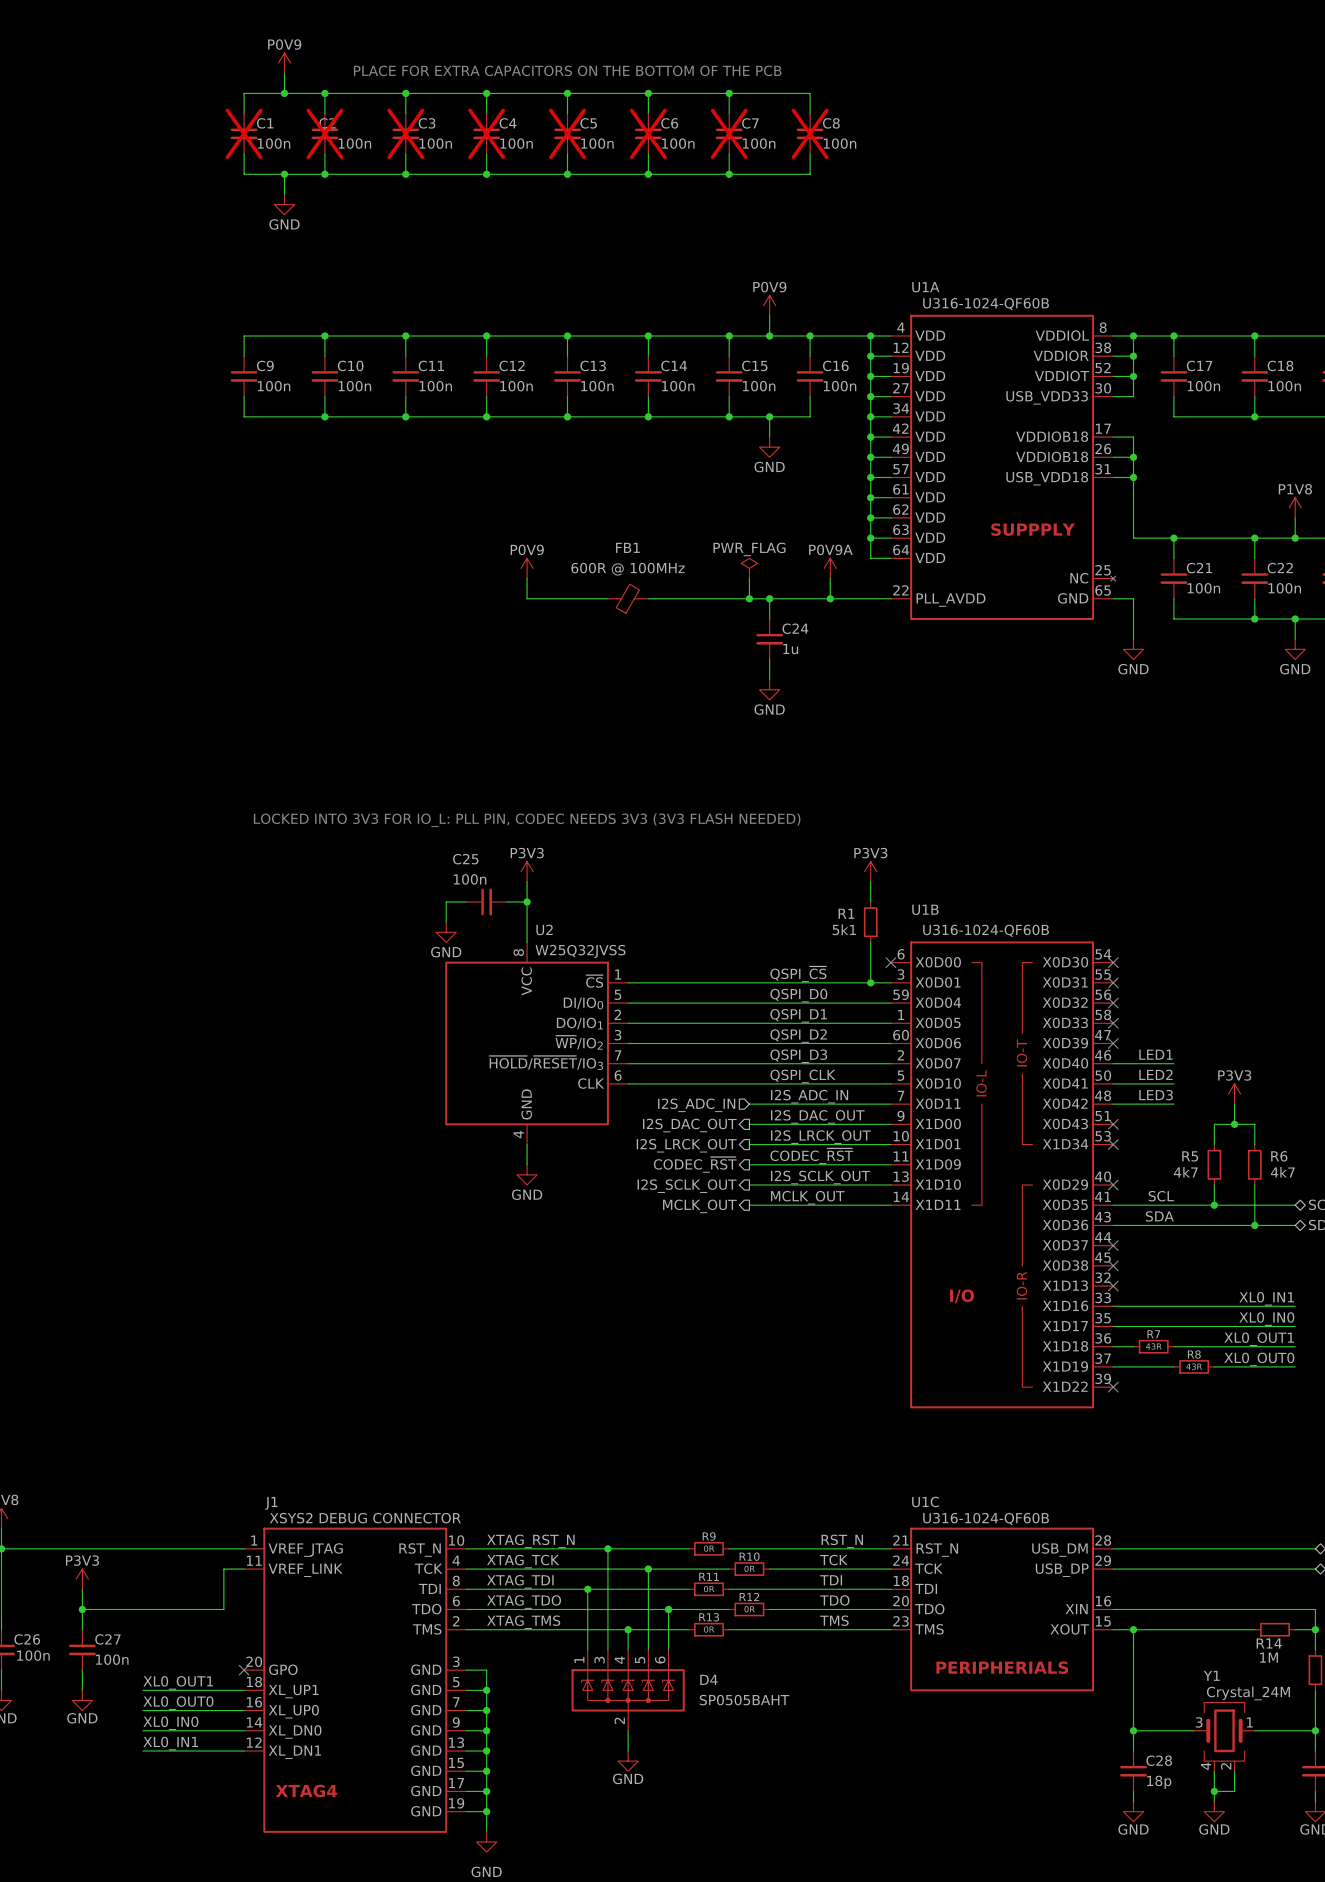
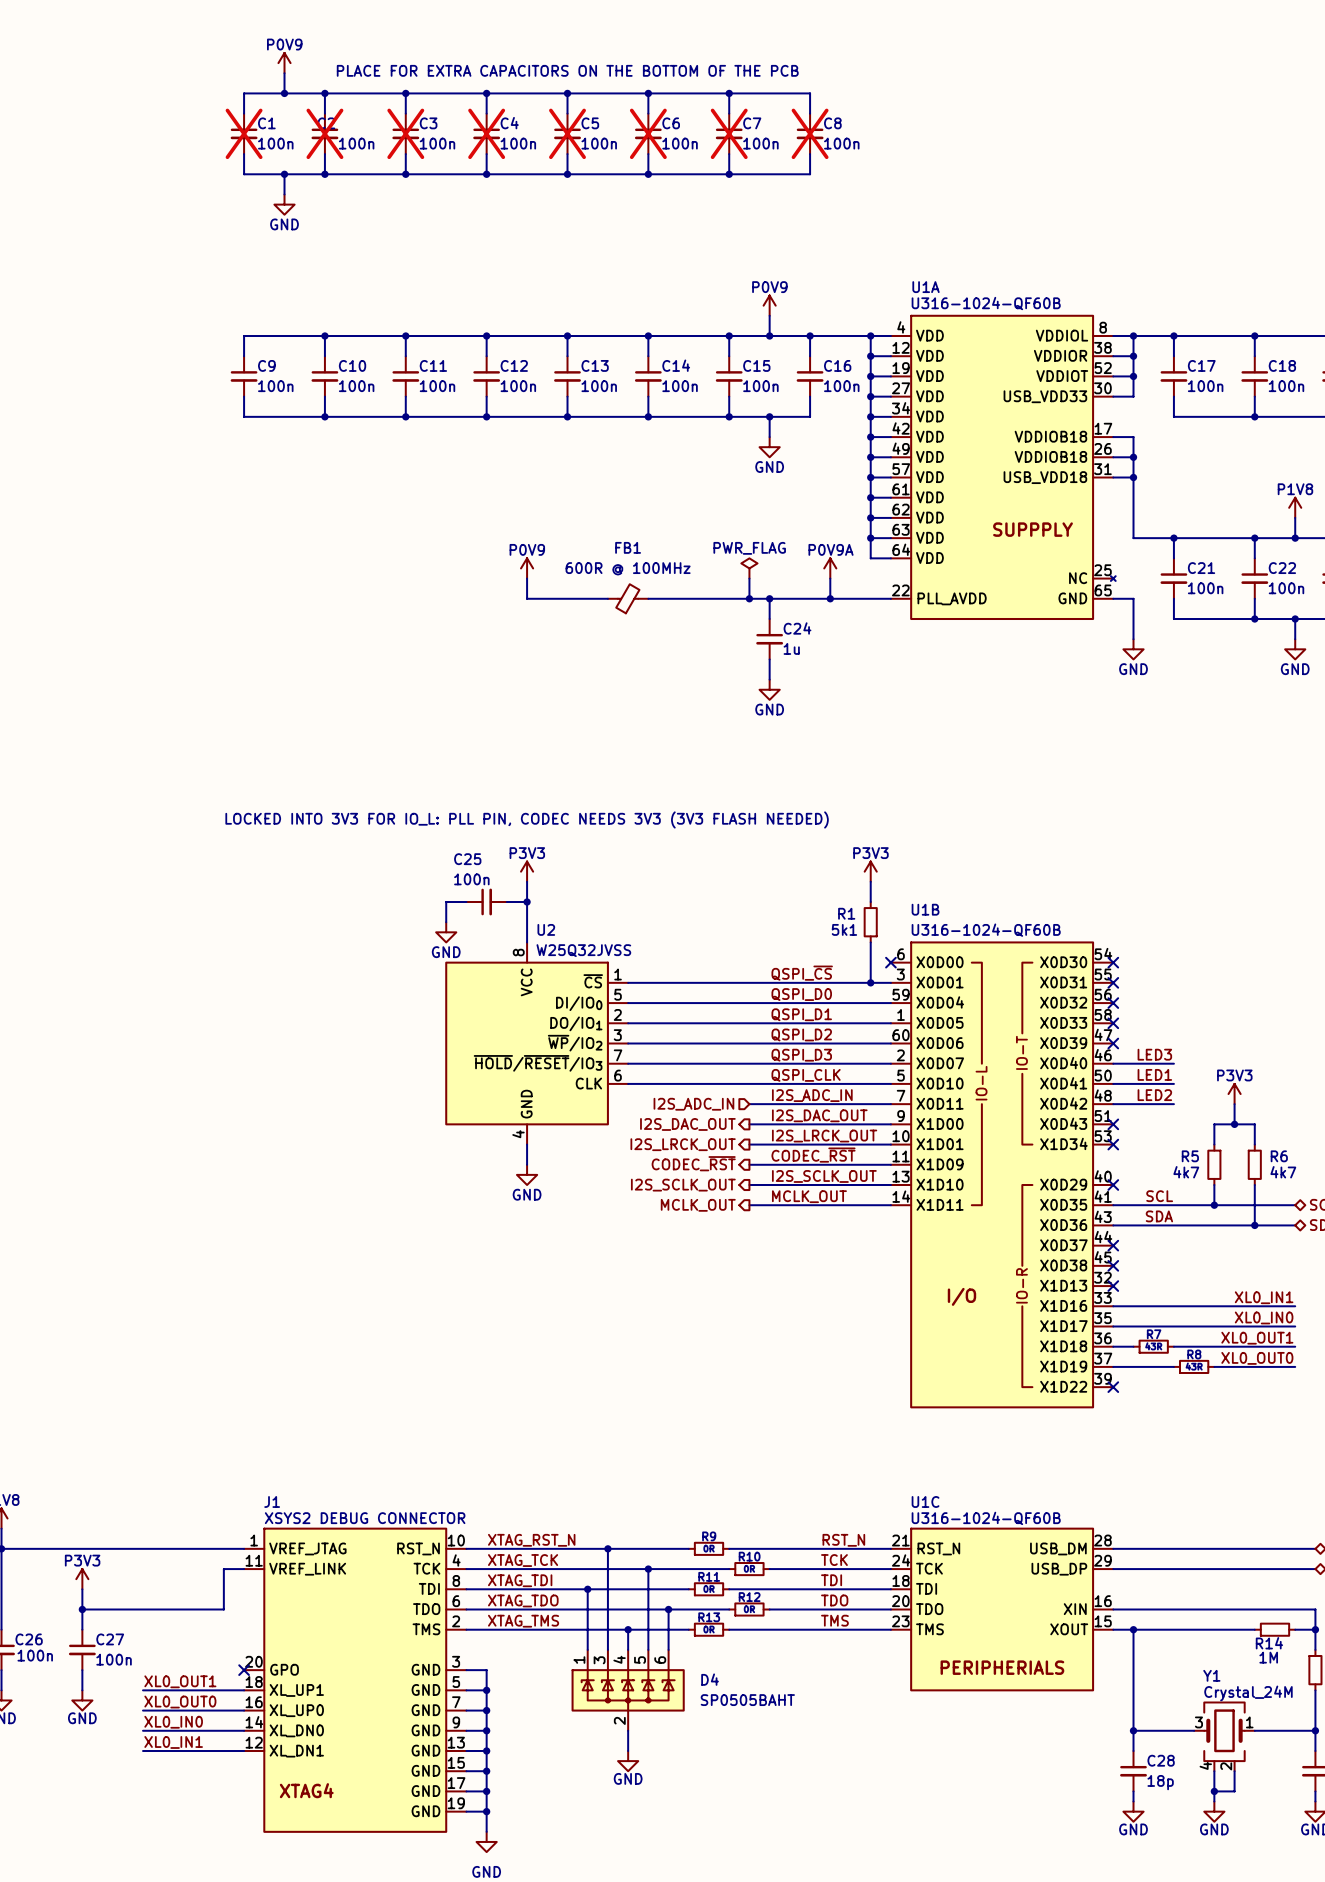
label: LED1 (1155, 1054) -> LED3 (1154, 1054)
label: LED2 (1155, 1074) -> LED1 (1154, 1074)
label: LED3 (1156, 1095) -> LED2 (1154, 1095)

